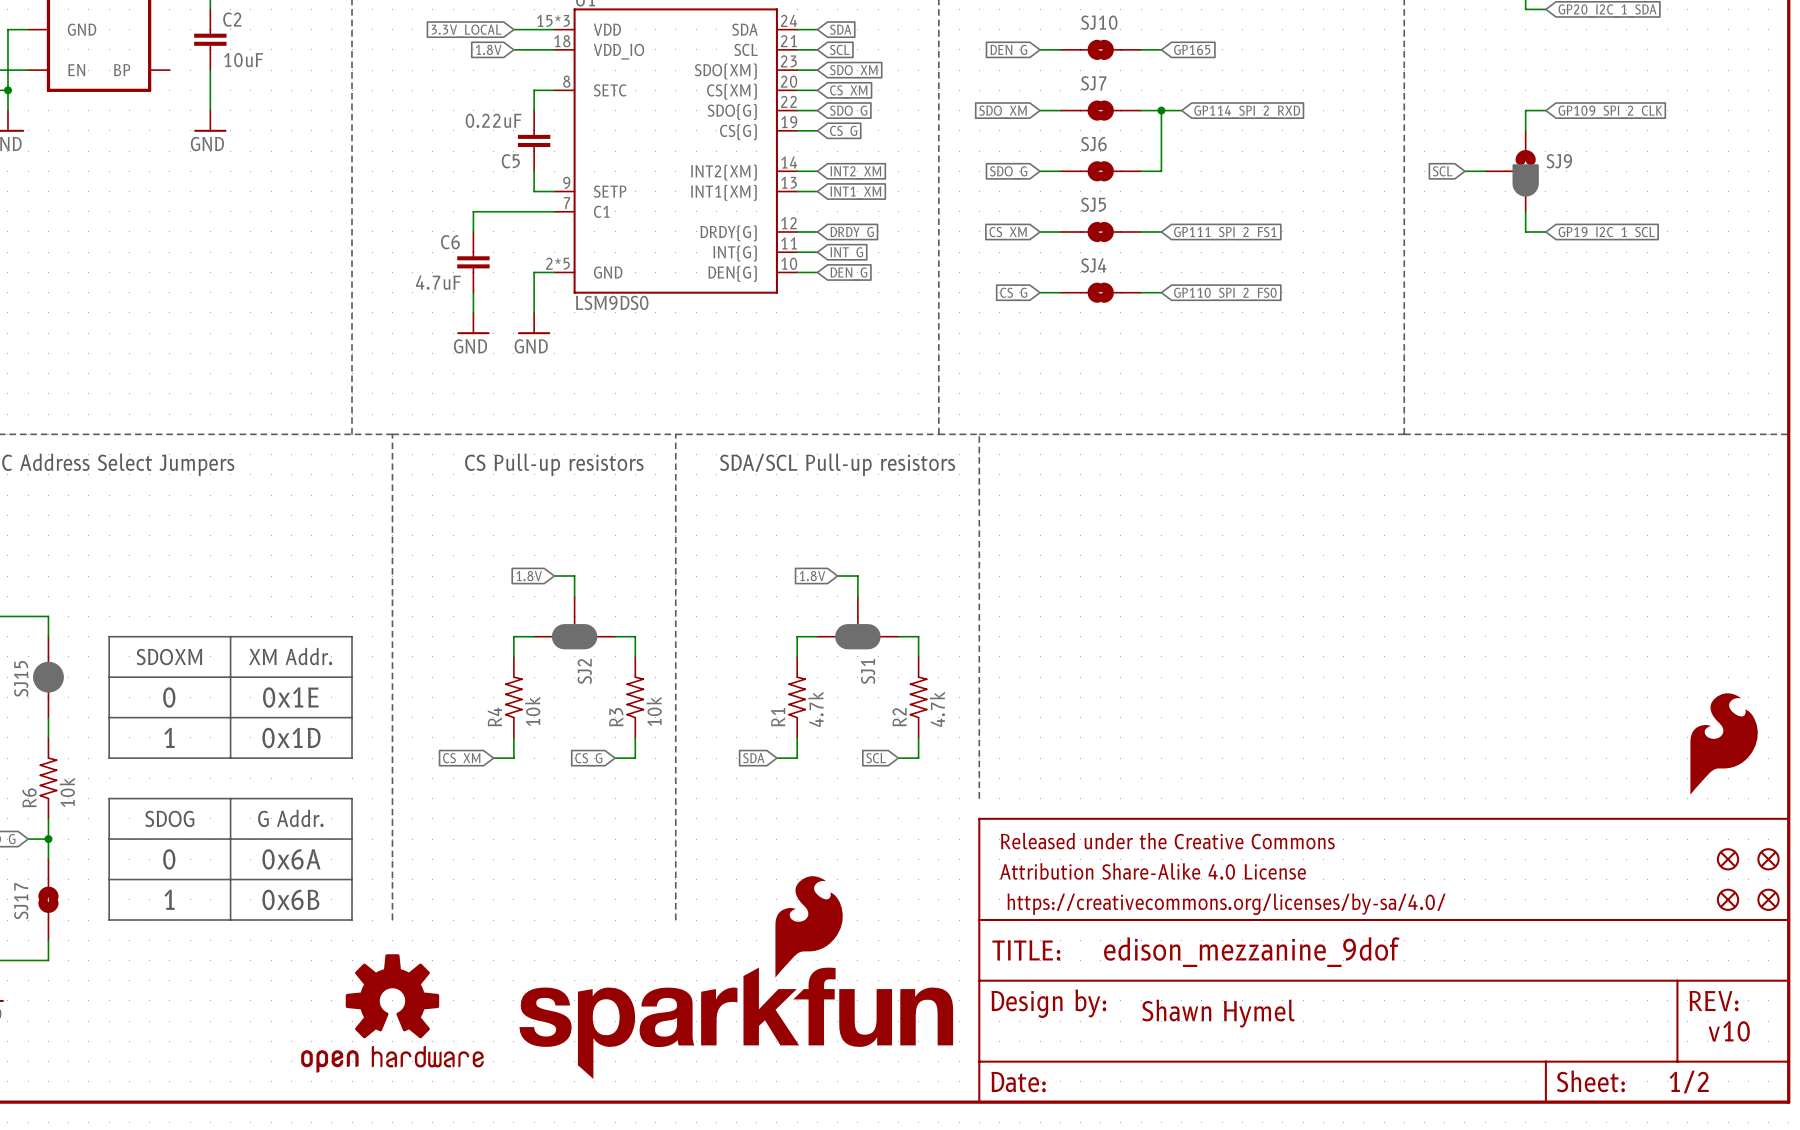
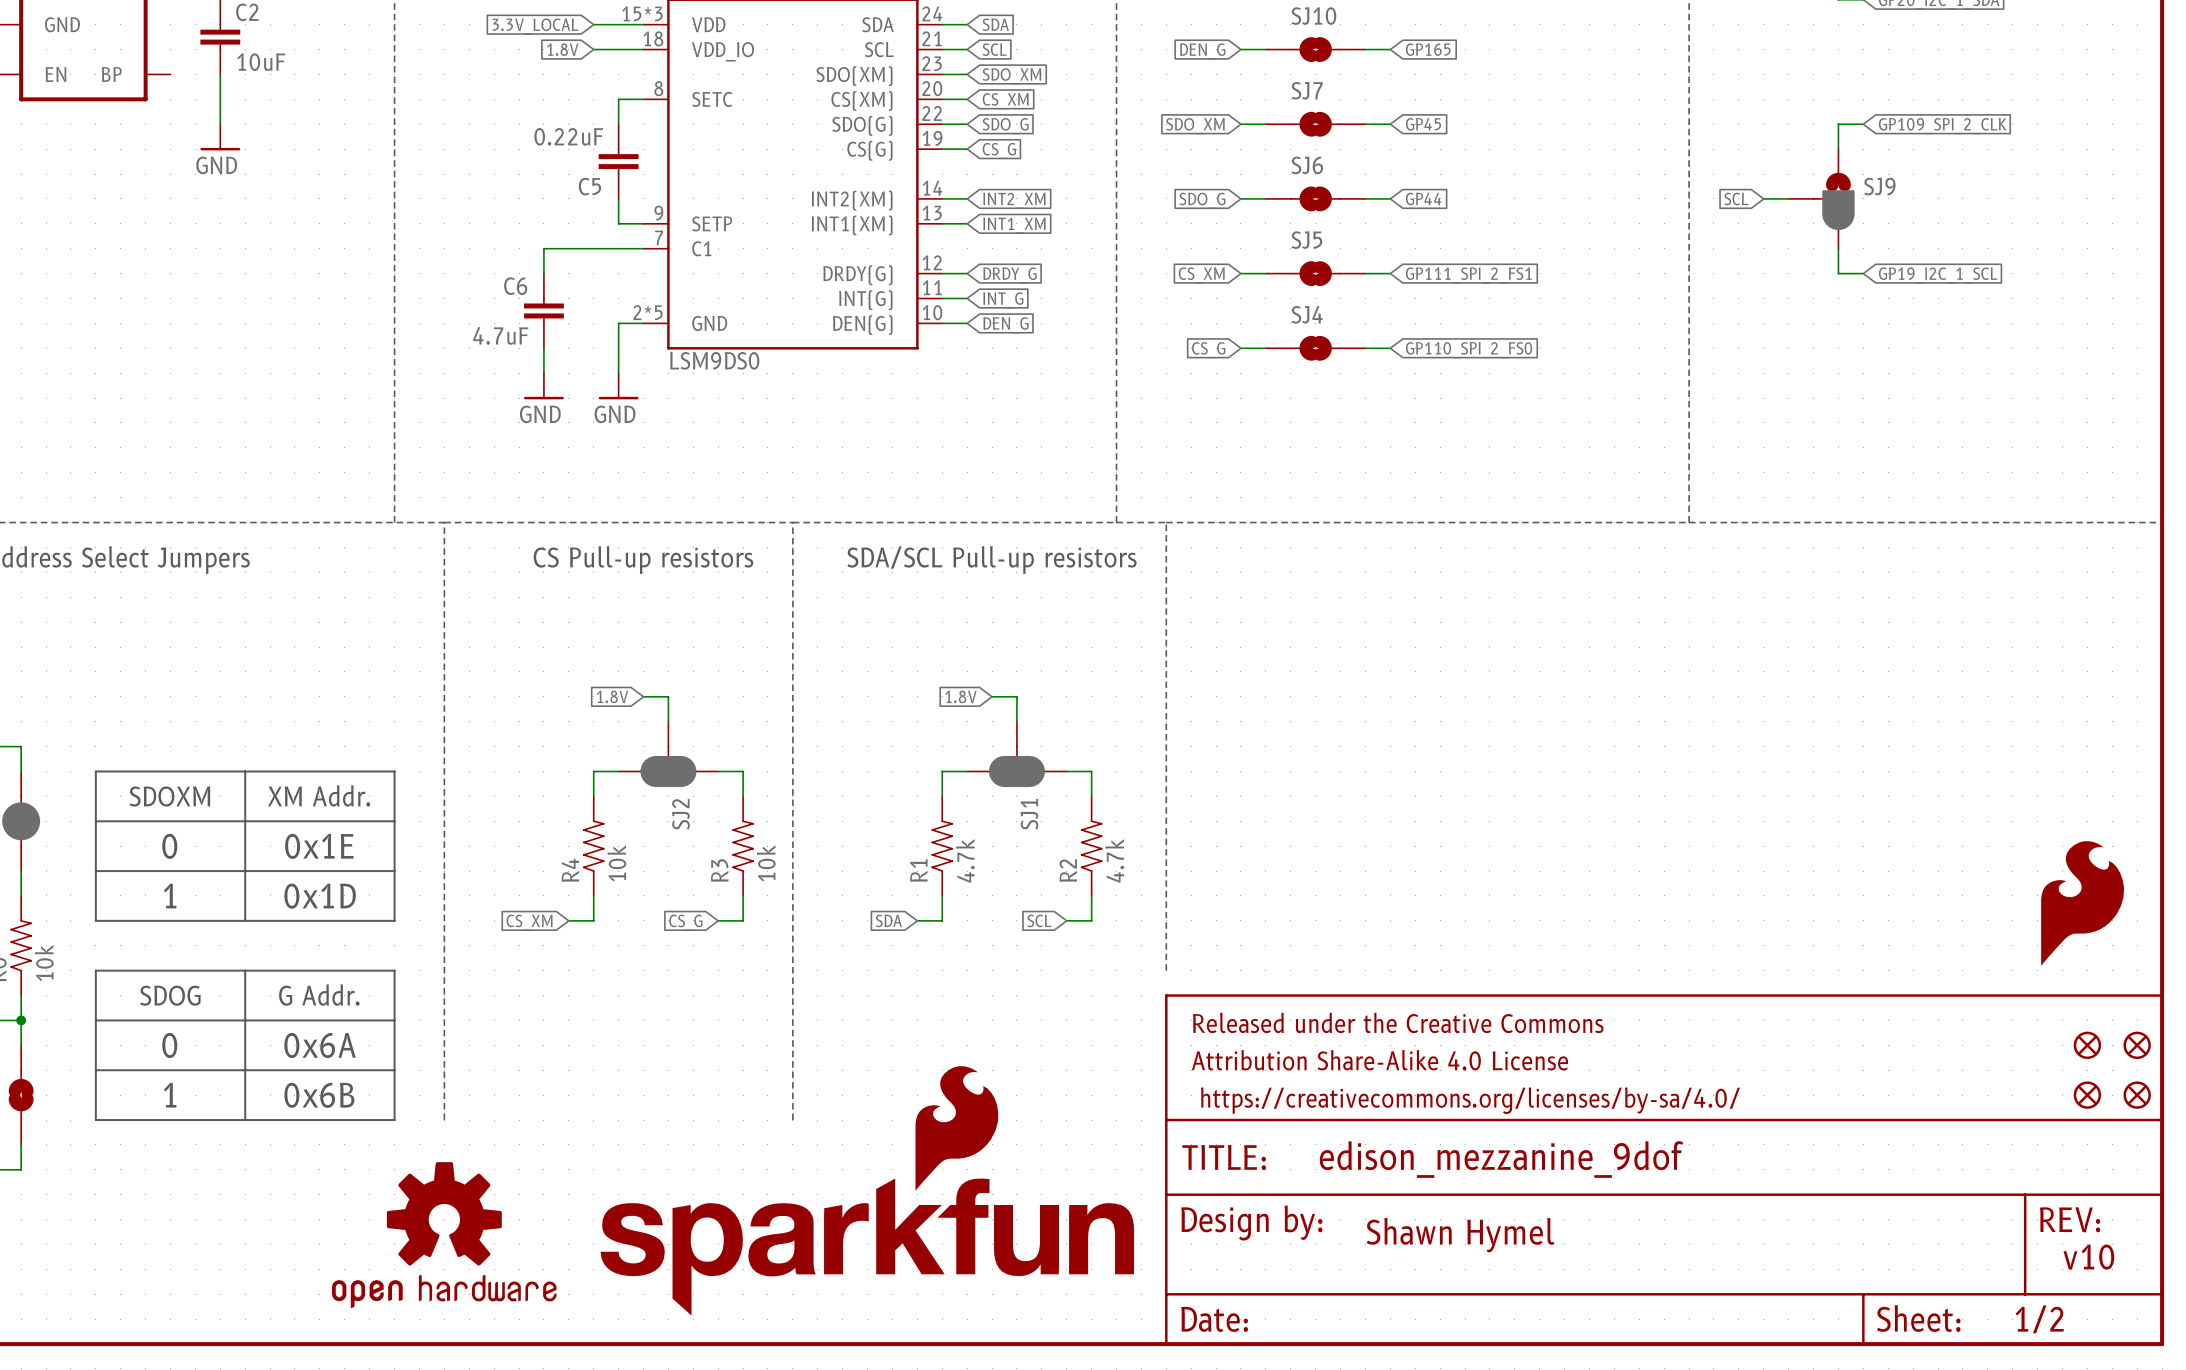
junction: (1161, 110) -> none
wire: (1181, 110) (1161, 110) (1161, 171) -> none
global label: none -> GP45 (1423, 124)
global label: GP114_SPI_2_RXD (1247, 112) -> none
global label: none -> GP44 (1423, 198)

